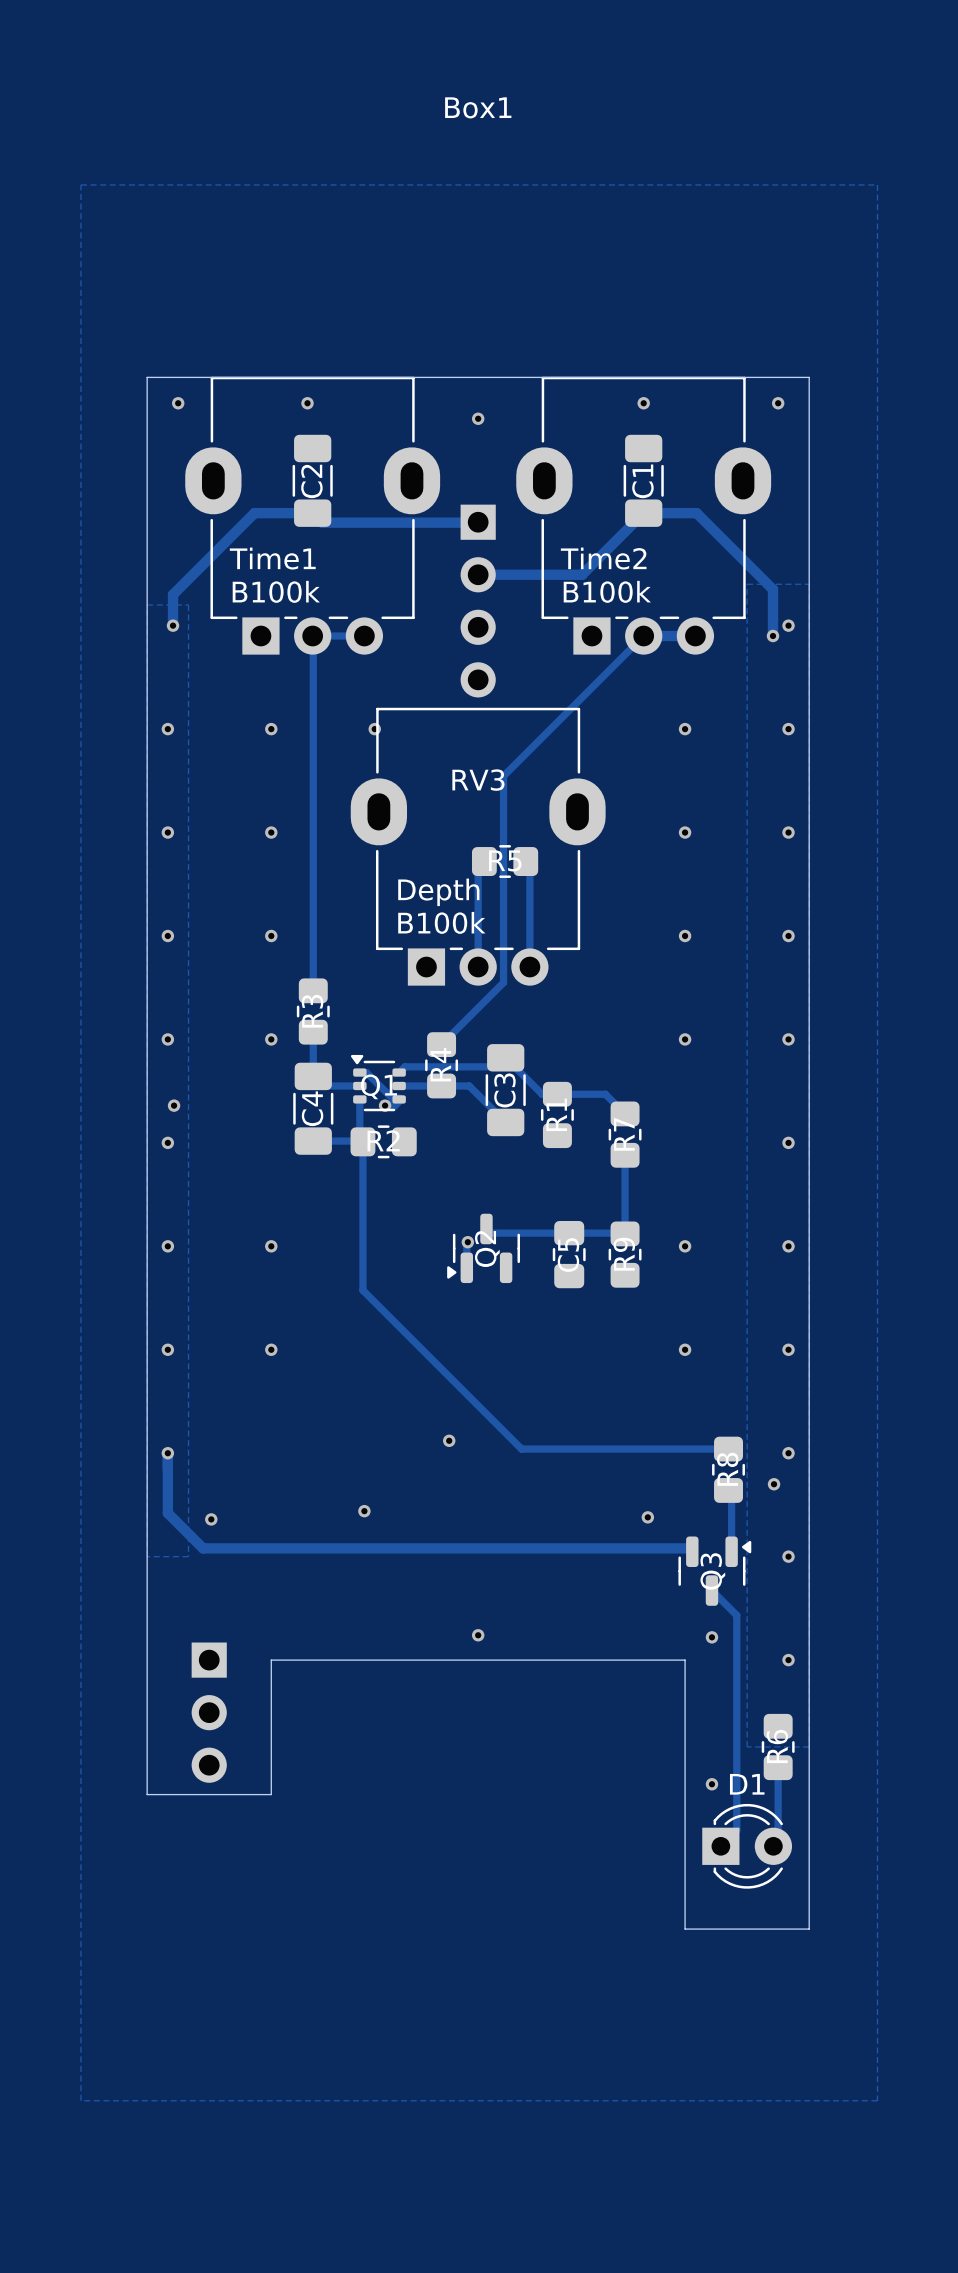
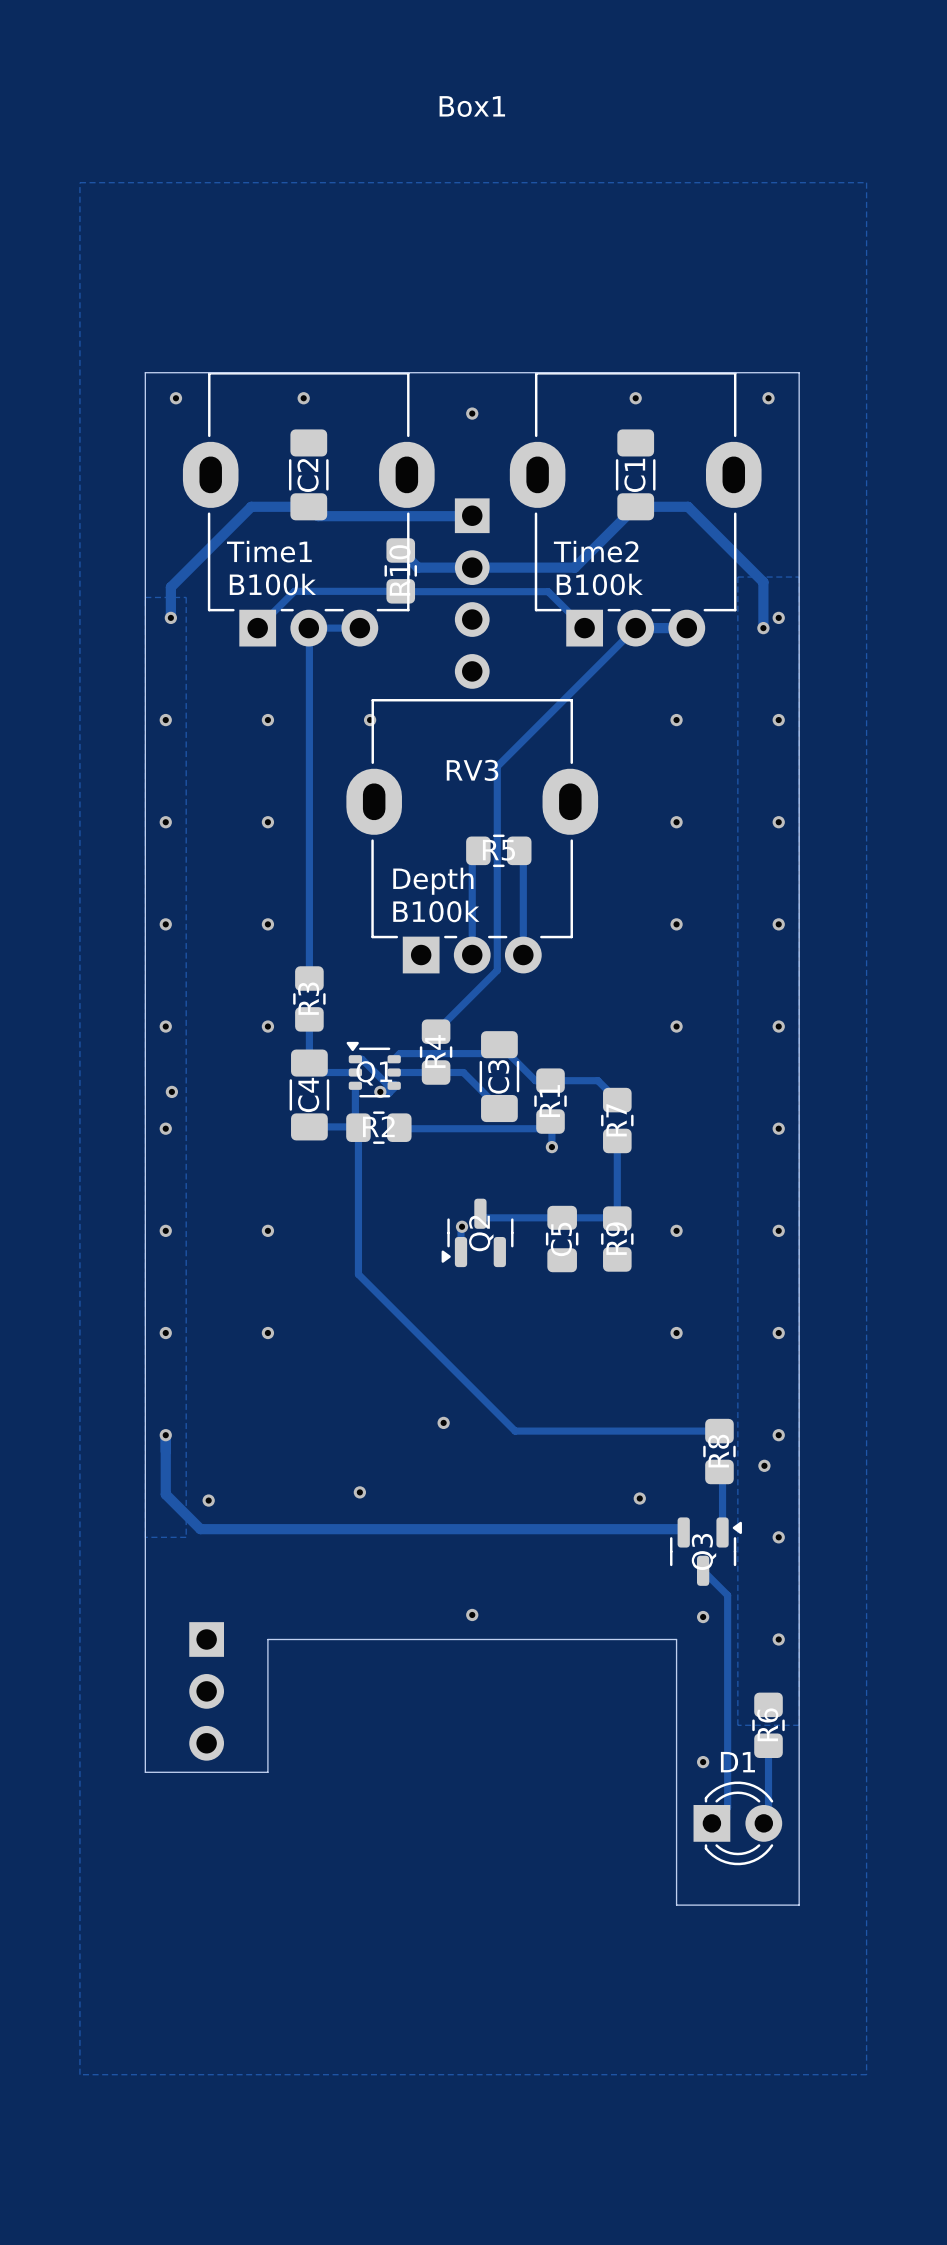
track: none -> (400, 550) (417, 567) (472, 567)
part: none -> (400, 570)
track: none -> (257, 628) (294, 591) (548, 591) (584, 628)
track: none -> (399, 1127) (543, 1128) (550, 1121) (551, 1147)
via: none -> (551, 1147)

